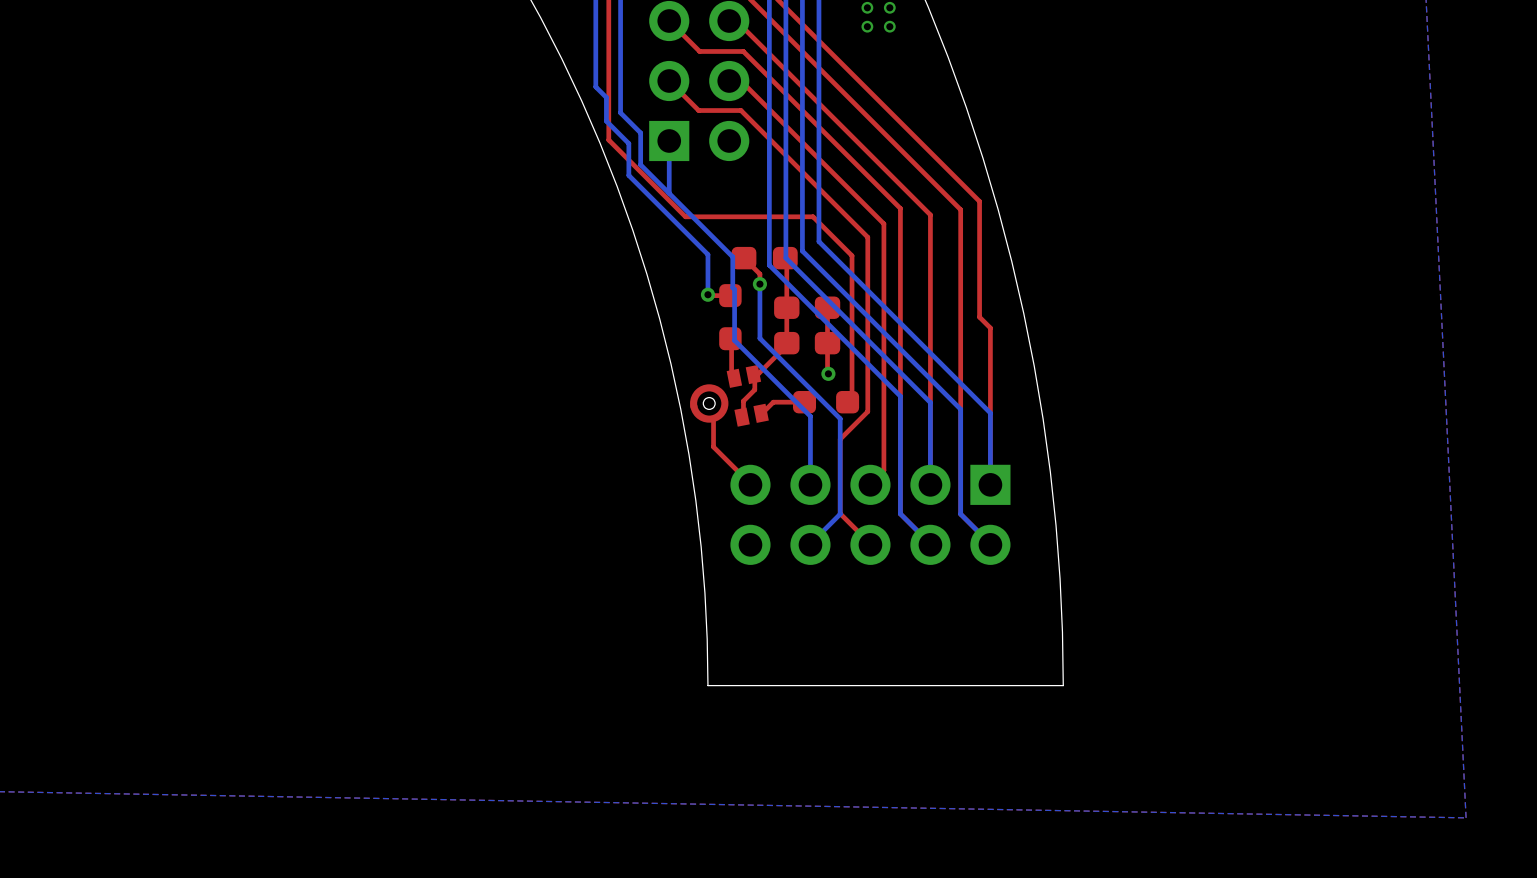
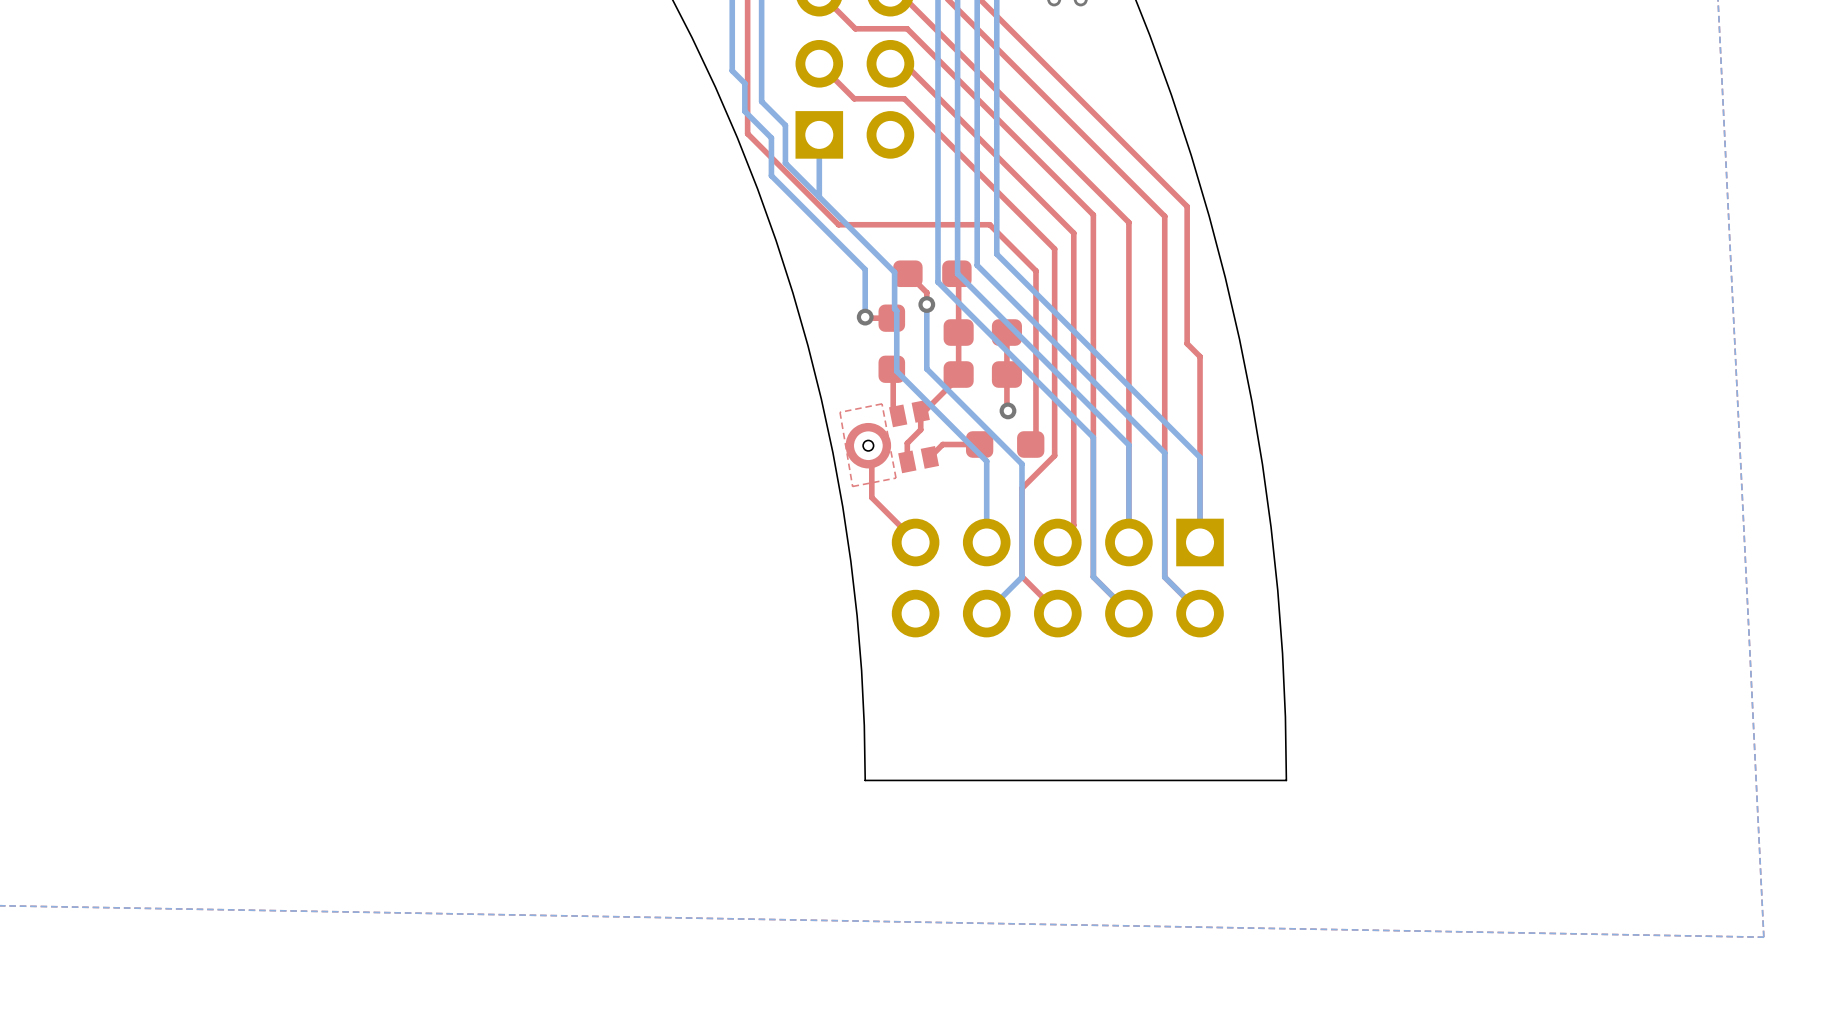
part footprint: [690, 364, 769, 427] -> [845, 400, 940, 474]
top zone outline: none -> (882, 403) (840, 412) (852, 486) (896, 478) (882, 403)

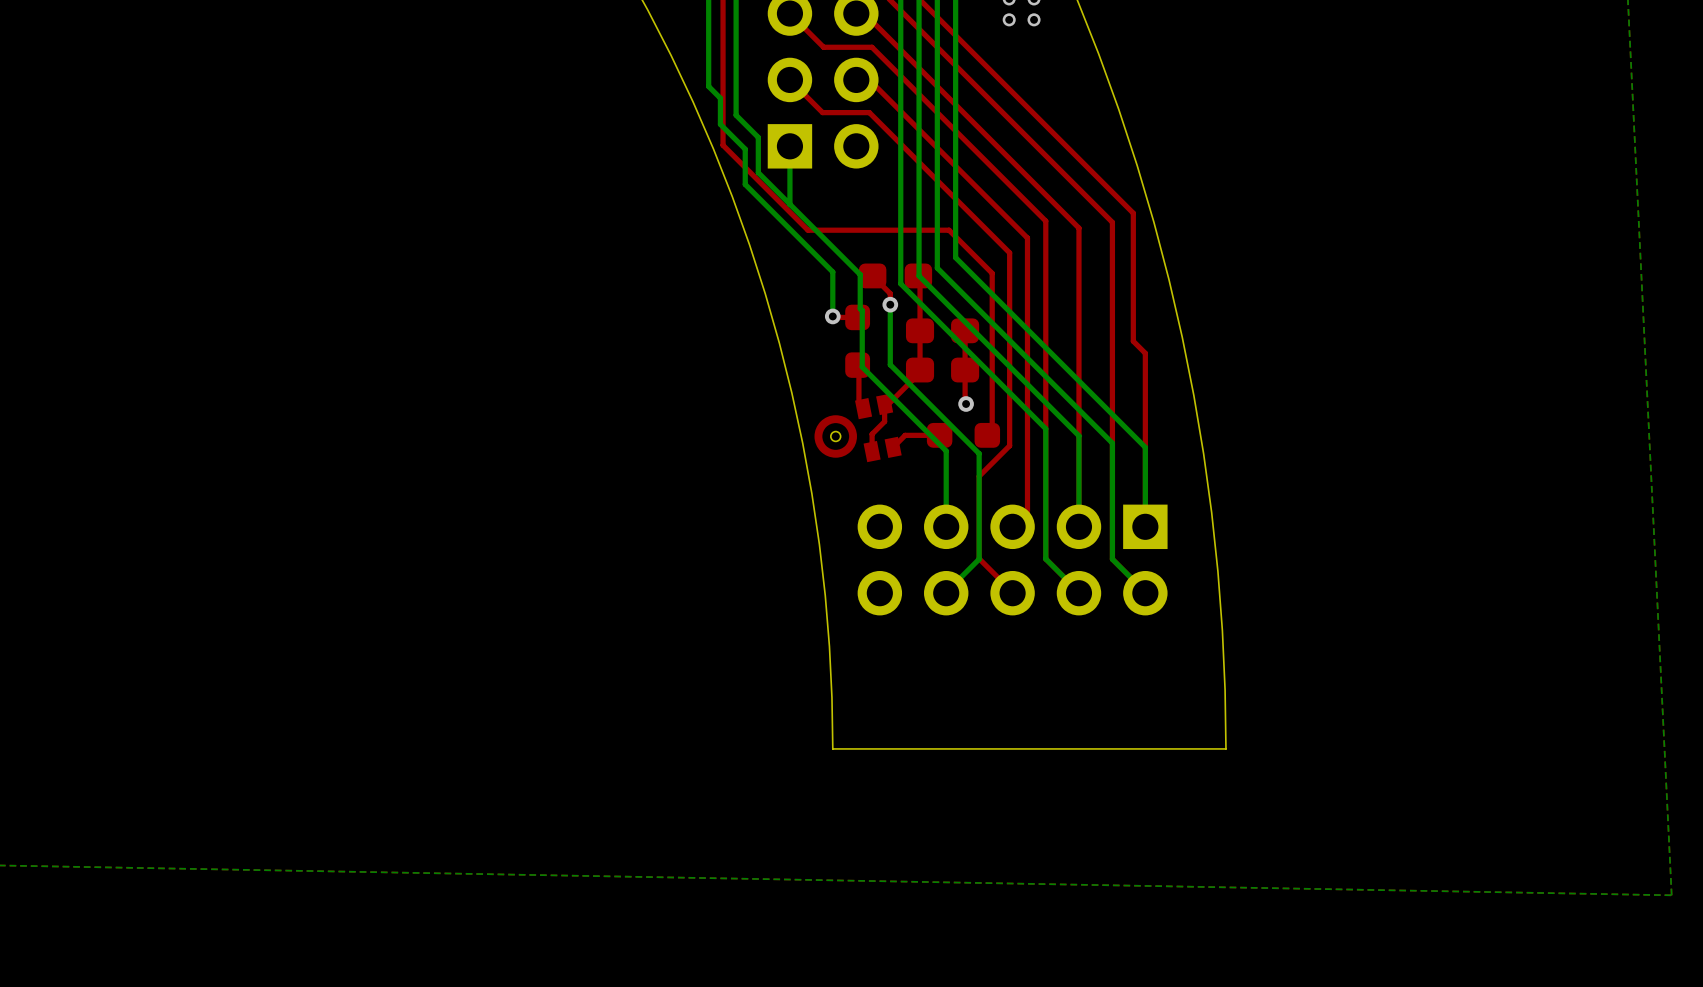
part footprint: [845, 400, 940, 474] -> [814, 393, 902, 463]
top zone outline: (882, 403) (840, 412) (852, 486) (896, 478) (882, 403) -> none
top track: (871, 463) (871, 497) (915, 541) -> none

